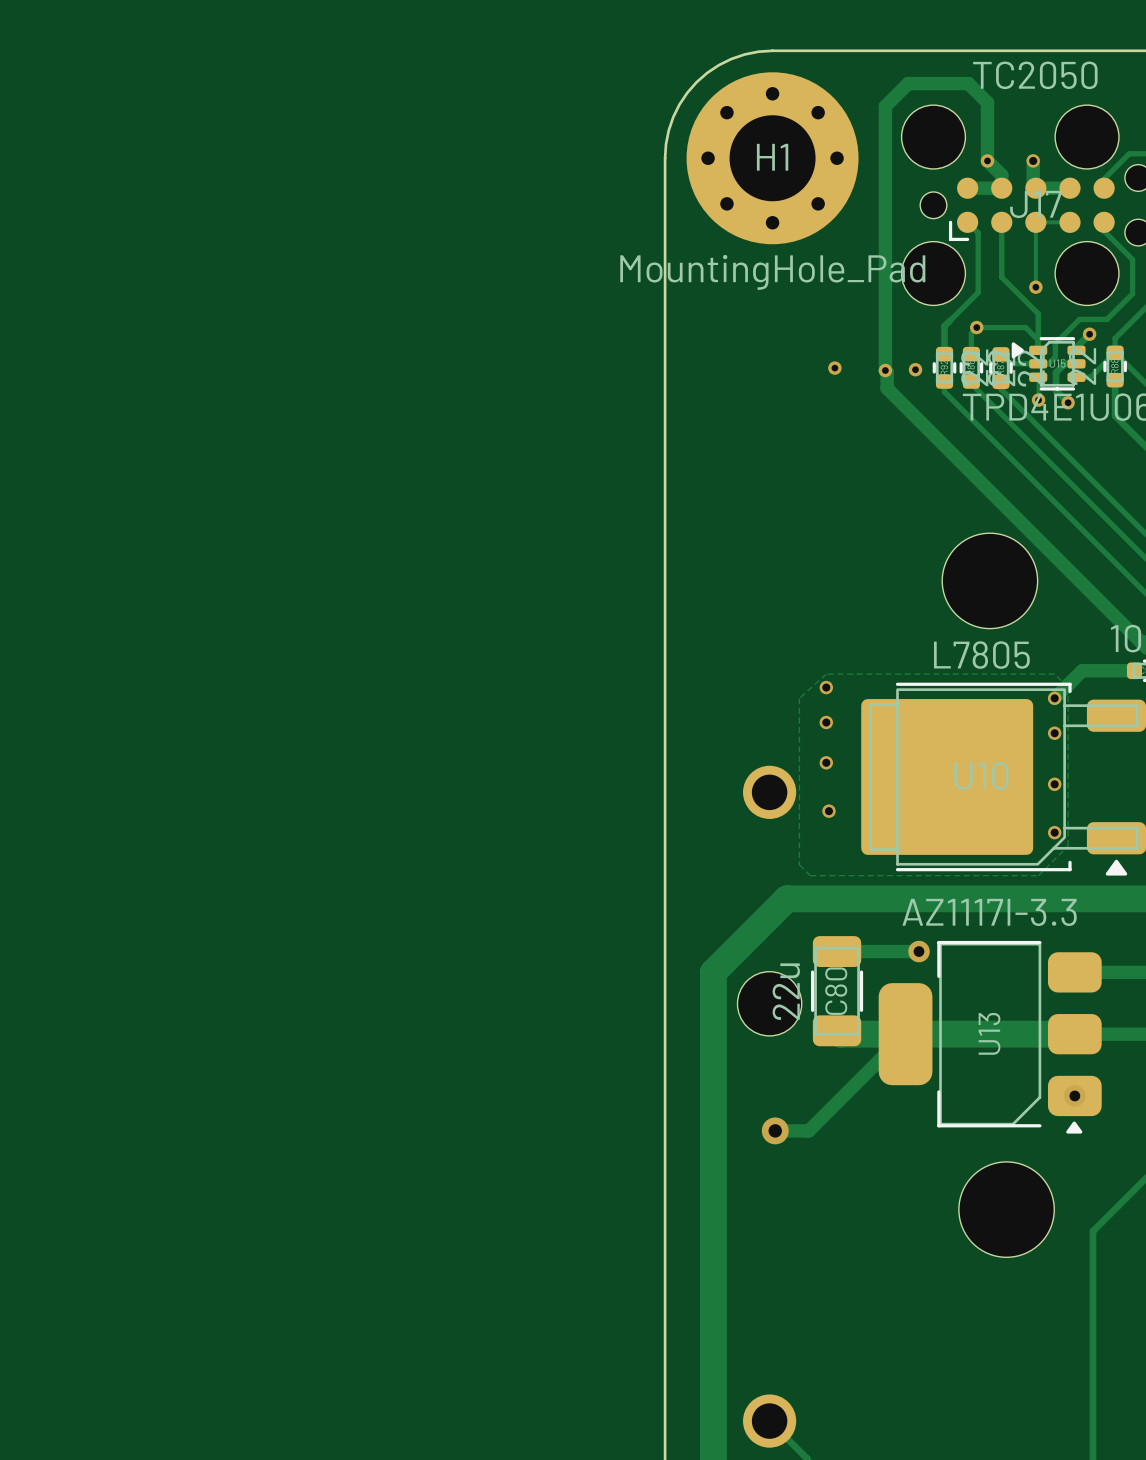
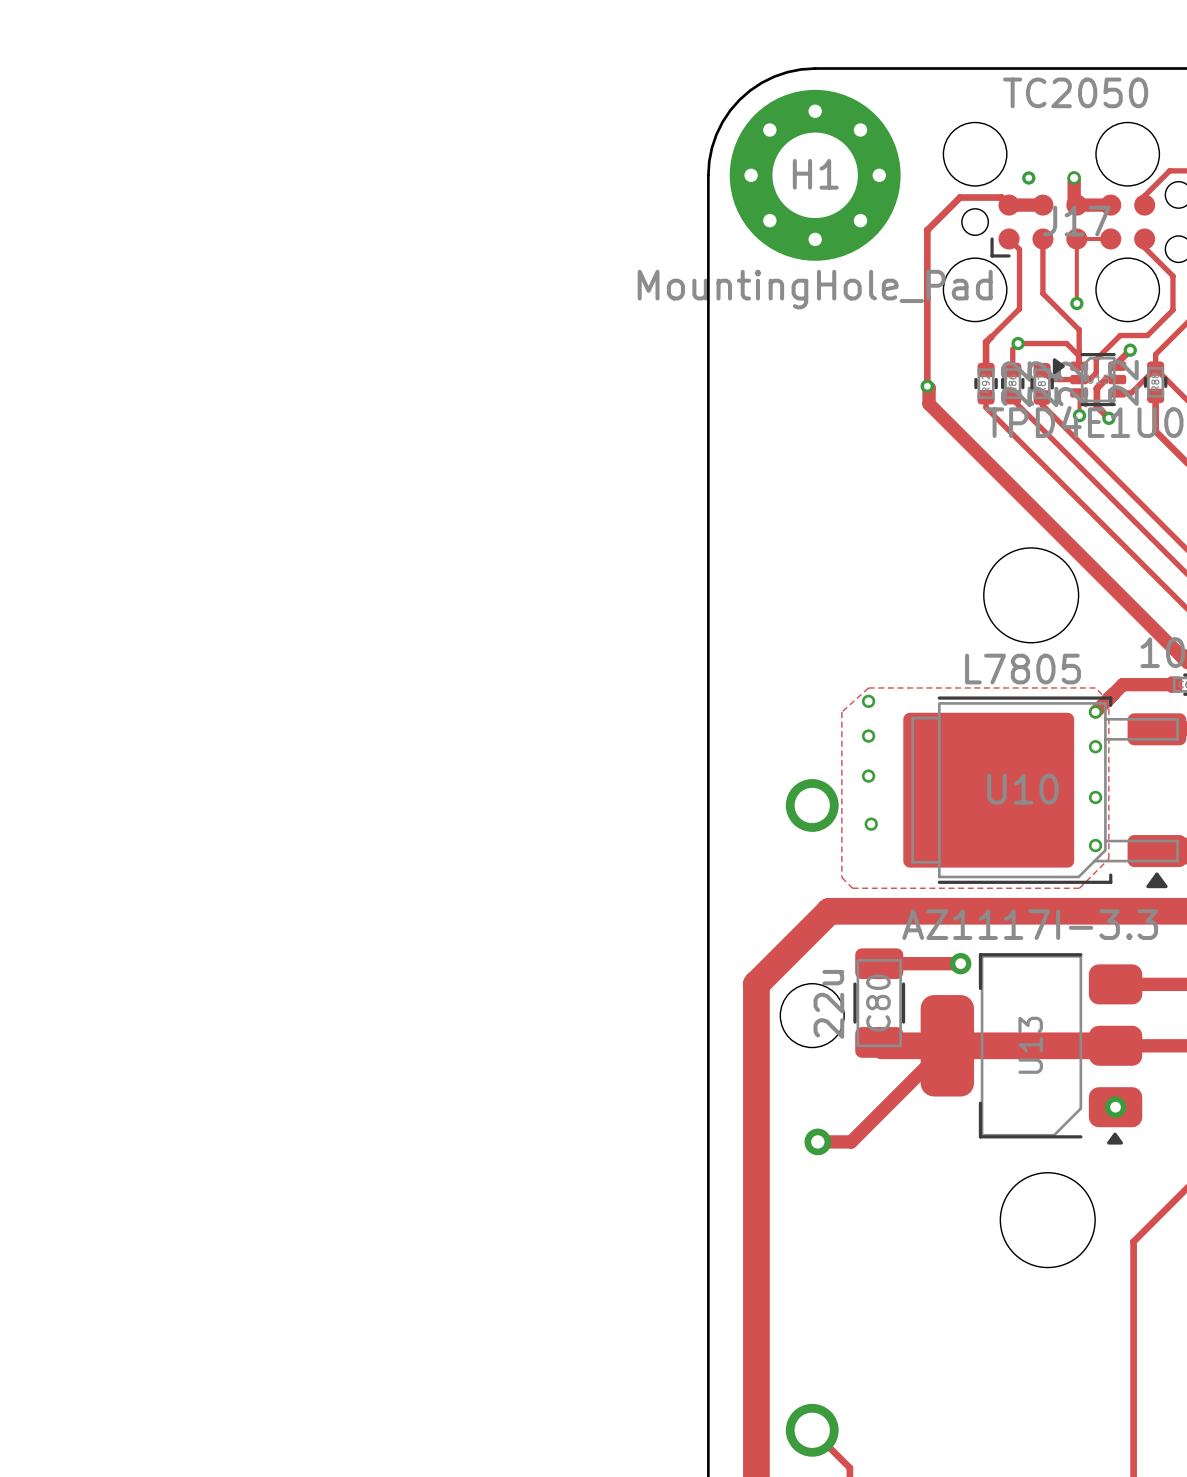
track: (1001, 188) (1001, 175) (987, 160) (987, 102) (968, 83) (908, 83) (885, 106) (885, 213) -> (1009, 205) (1001, 197) (960, 197) (927, 230)
track width: thick (885, 213) (885, 370) -> thin (927, 230) (927, 386)
via: (834, 368) -> none
via: (915, 369) -> none

